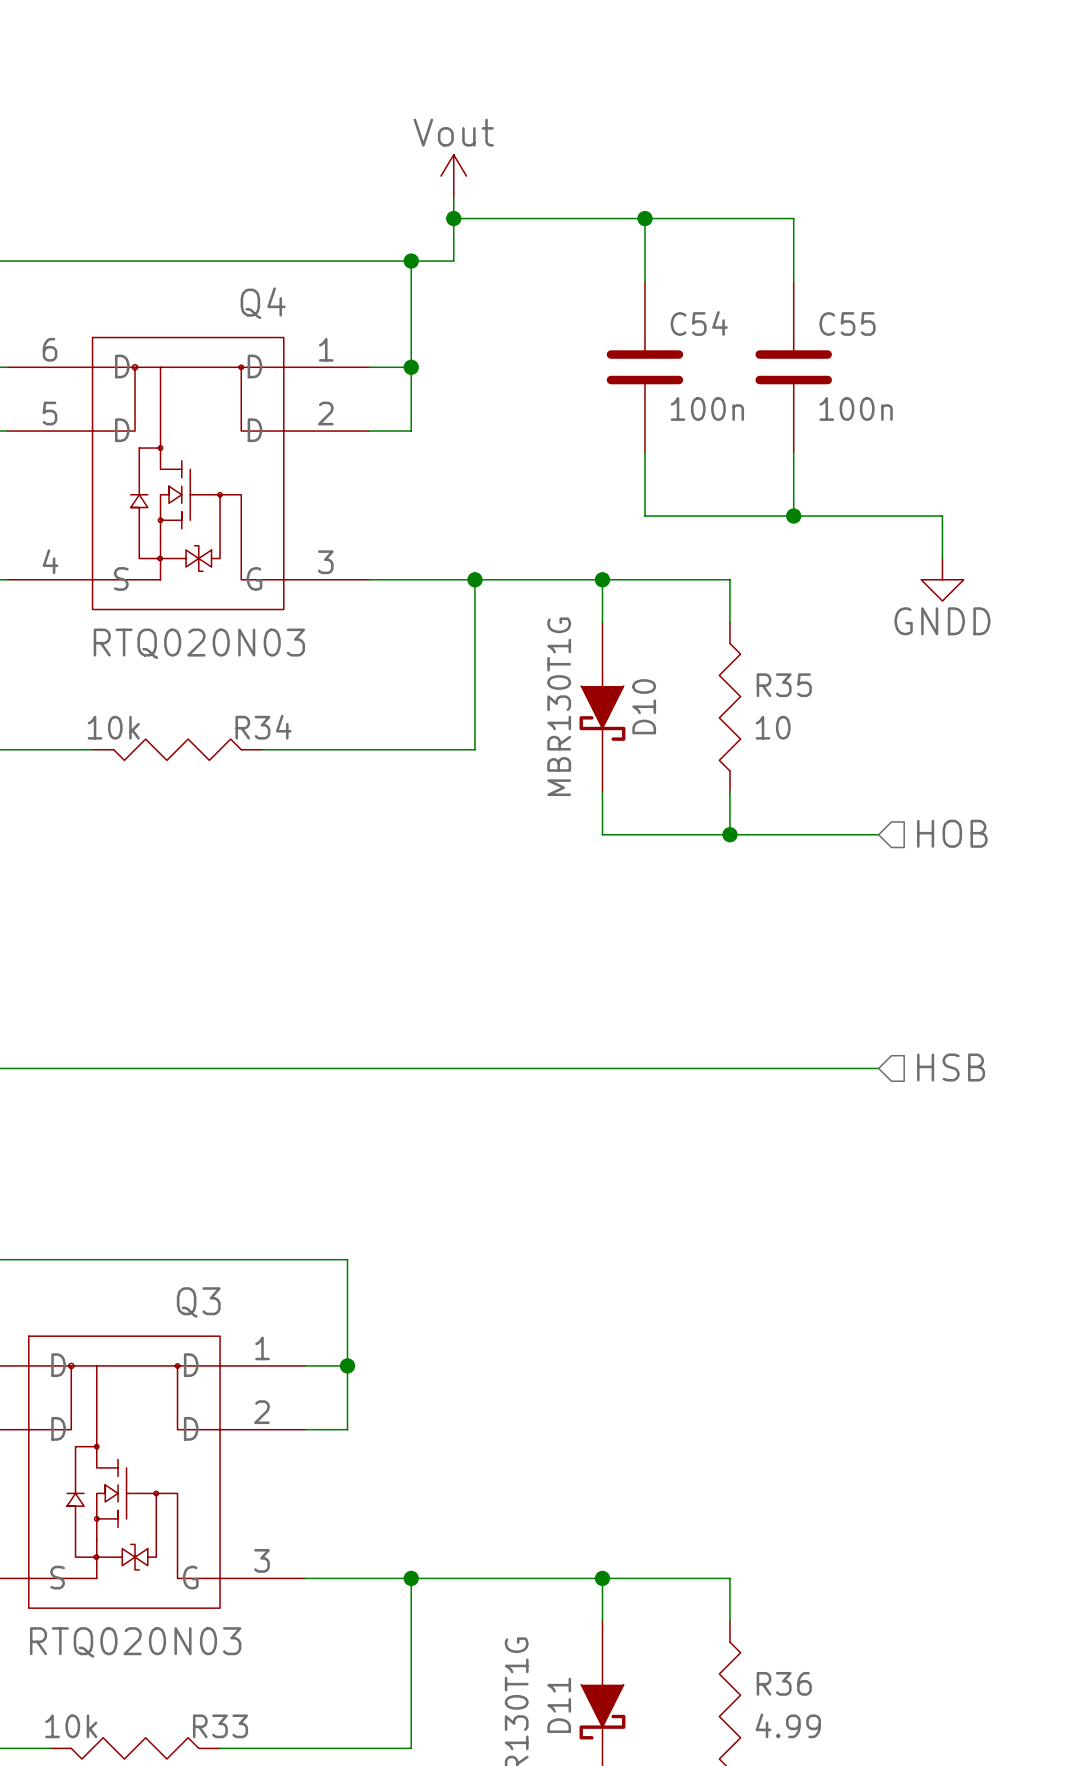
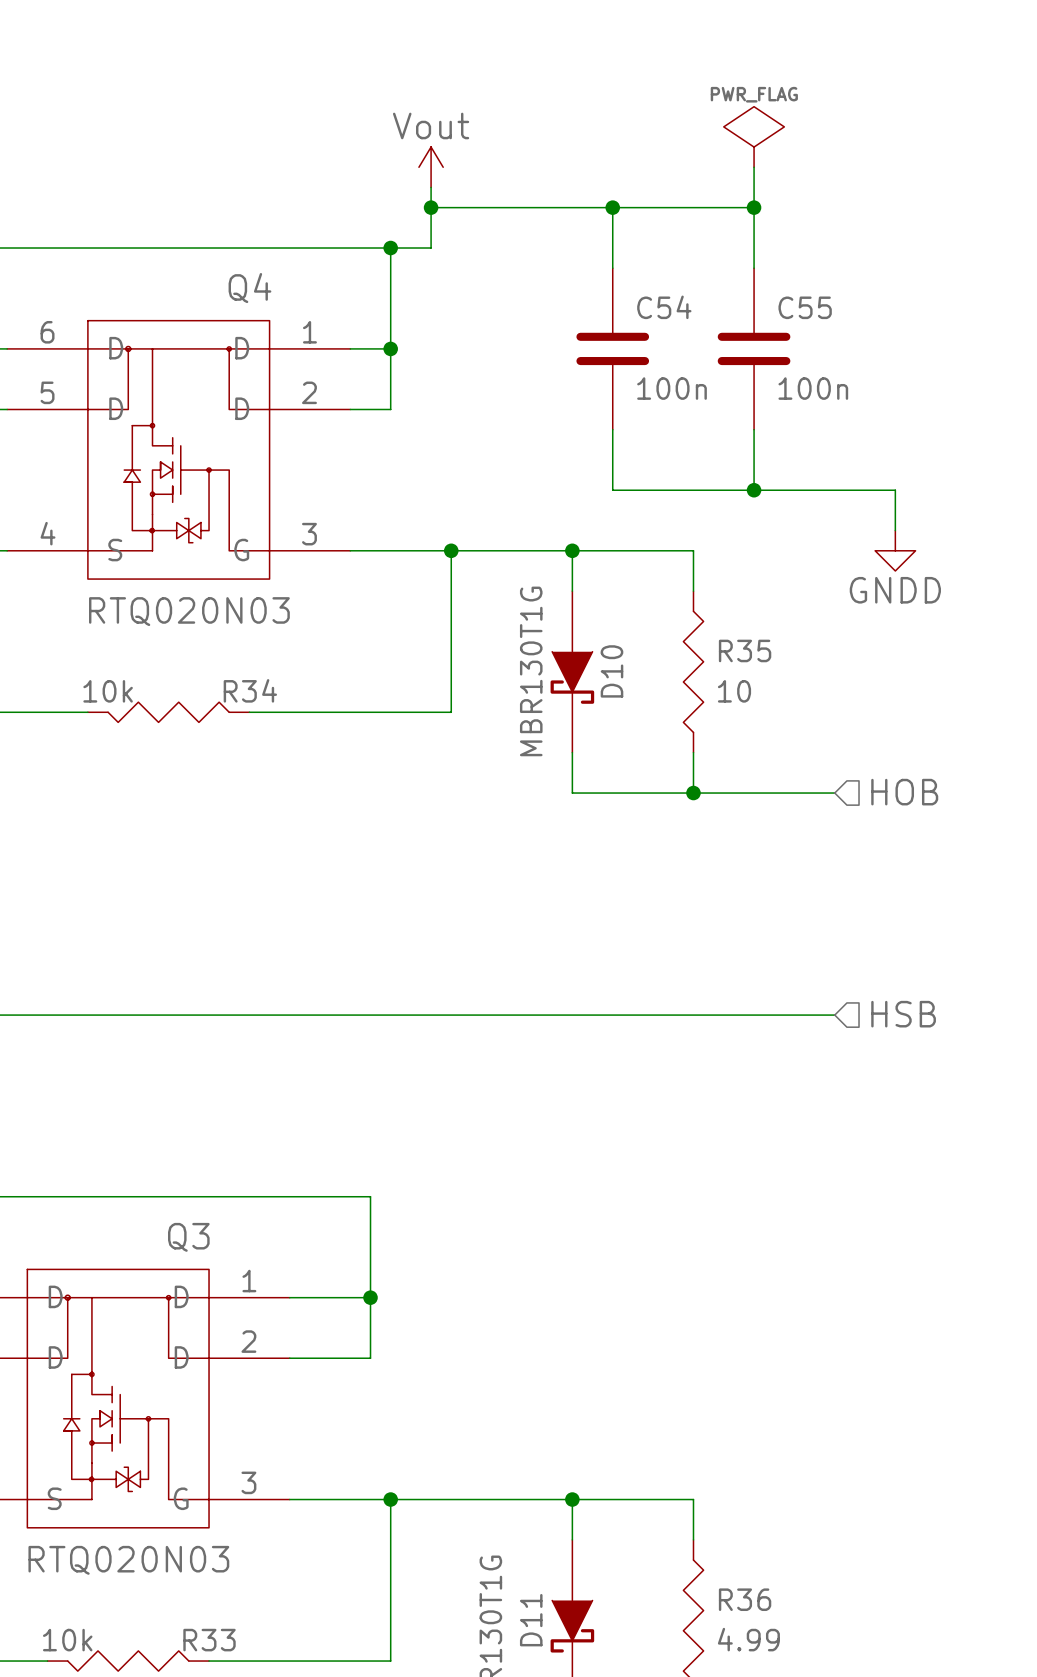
power symbol: none -> PWR_FLAG (754, 136)
wire: none -> (754, 167) (754, 207)
junction: none -> (754, 207)
wire: (347, 1259) (347, 1429) -> (330, 1196) (370, 1196) (370, 1358) (330, 1358)
wire: none -> (330, 1297) (370, 1297)
junction position: (347, 1365) -> (370, 1297)

